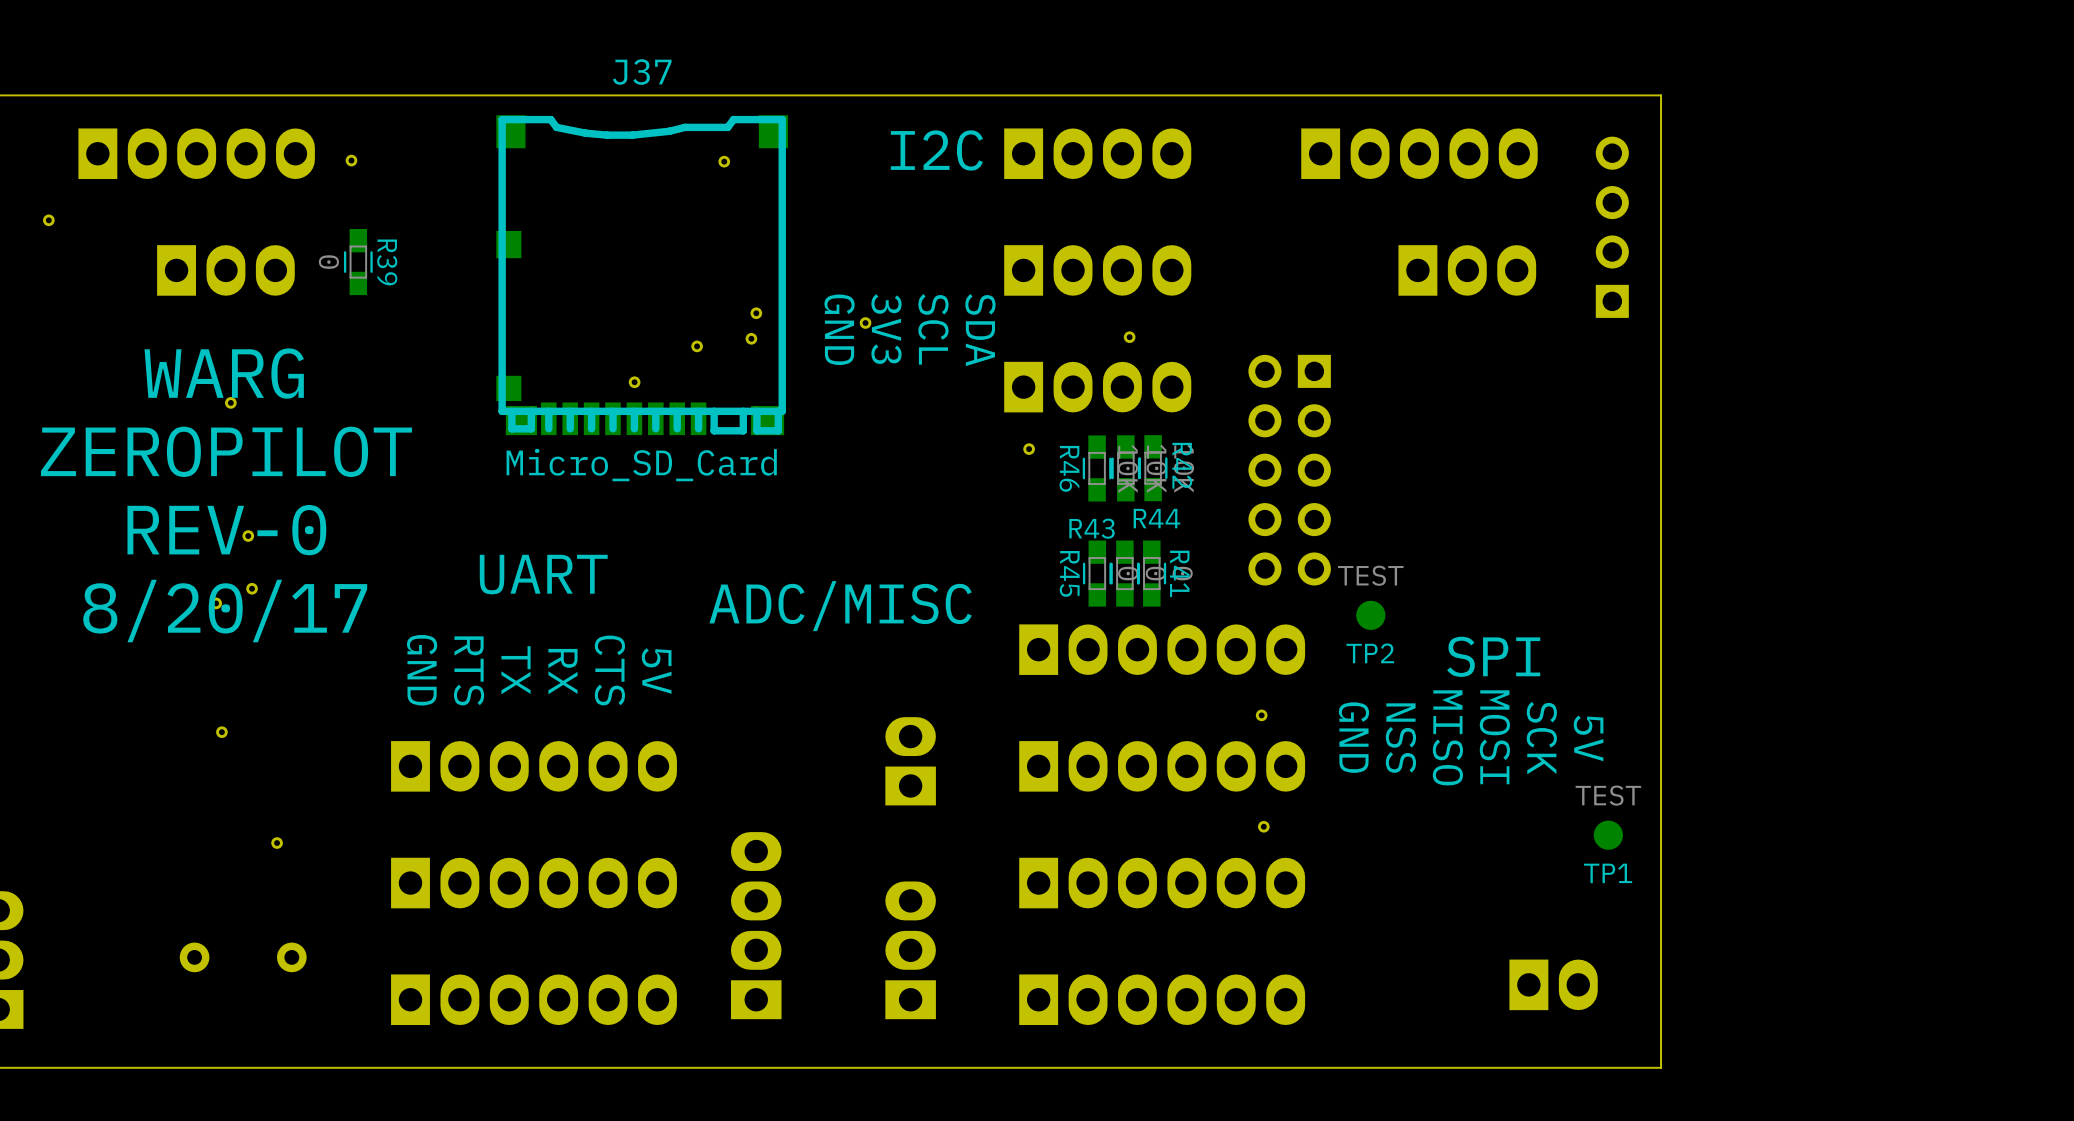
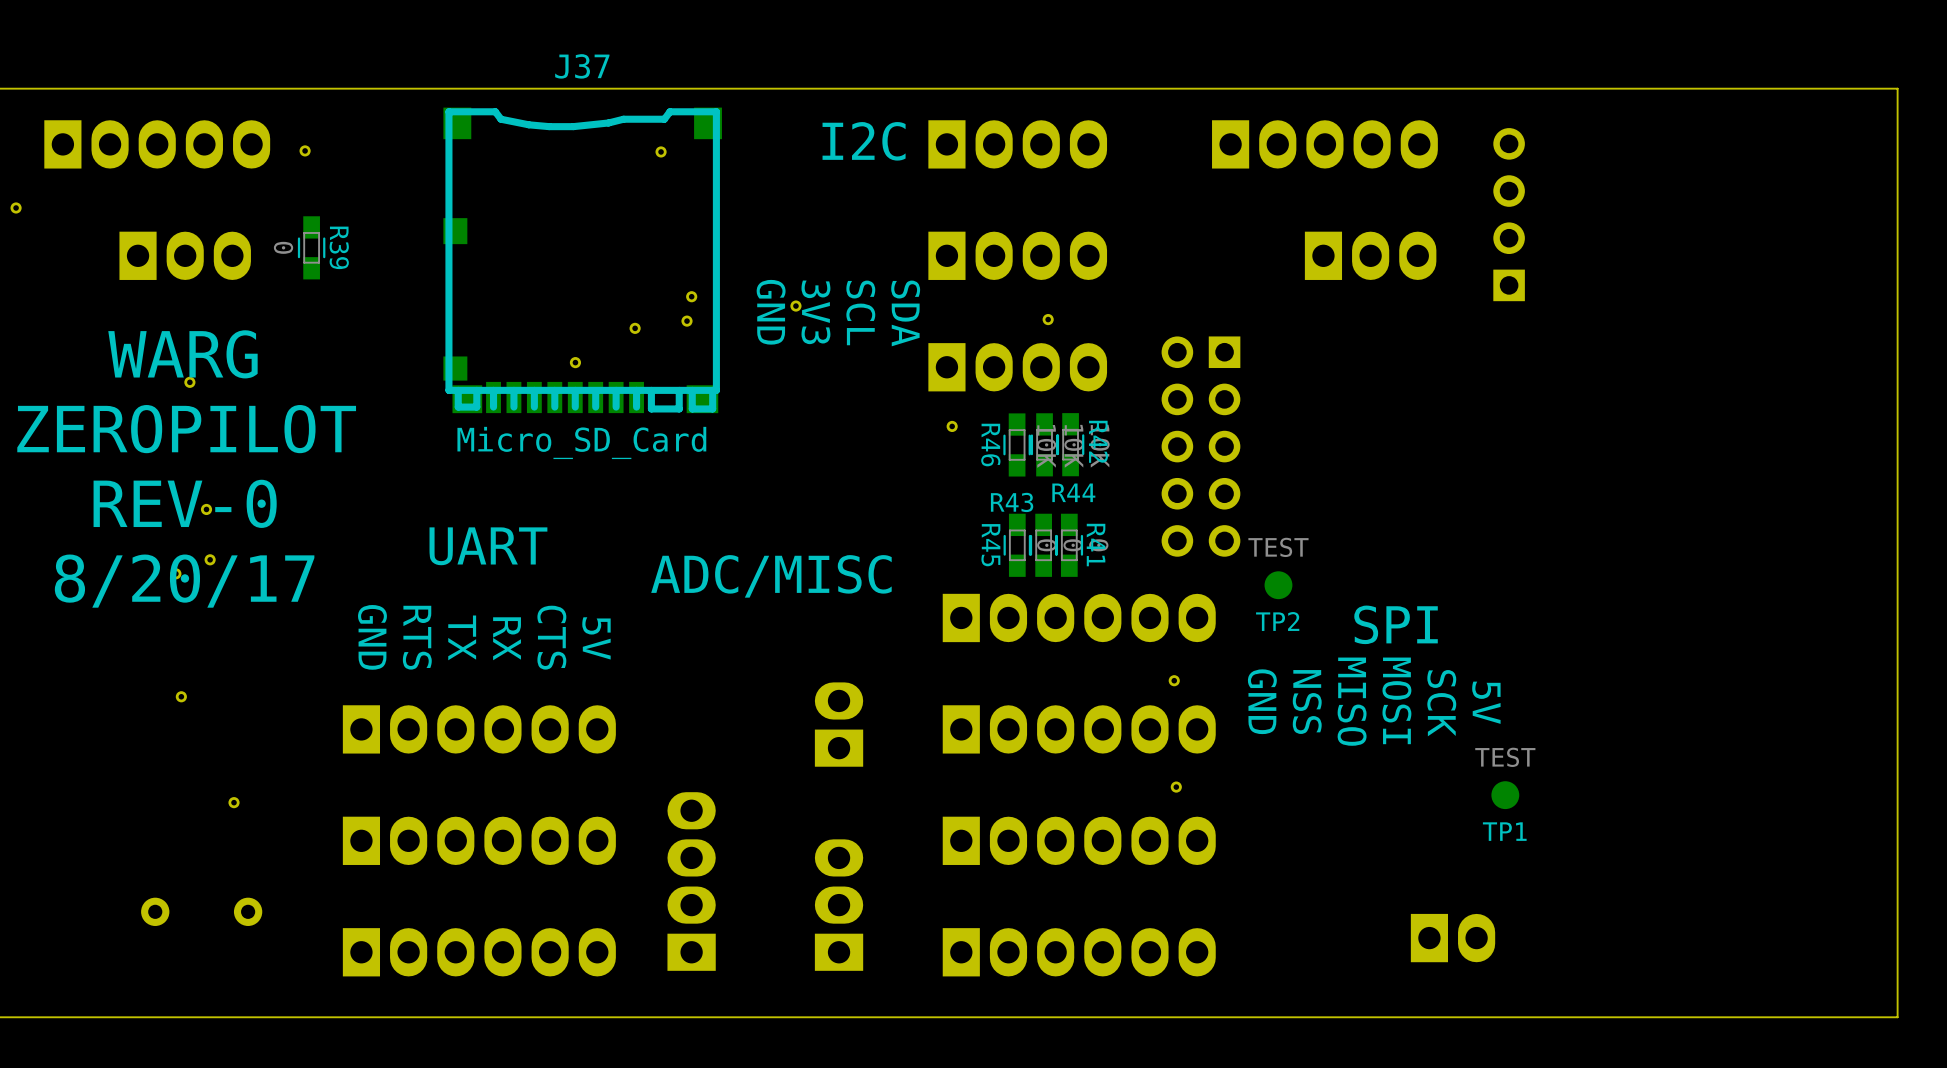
board edge: (1661, 95) (1661, 1067) -> (1555, 88) (1897, 88) (1897, 1017) (1555, 1017)

